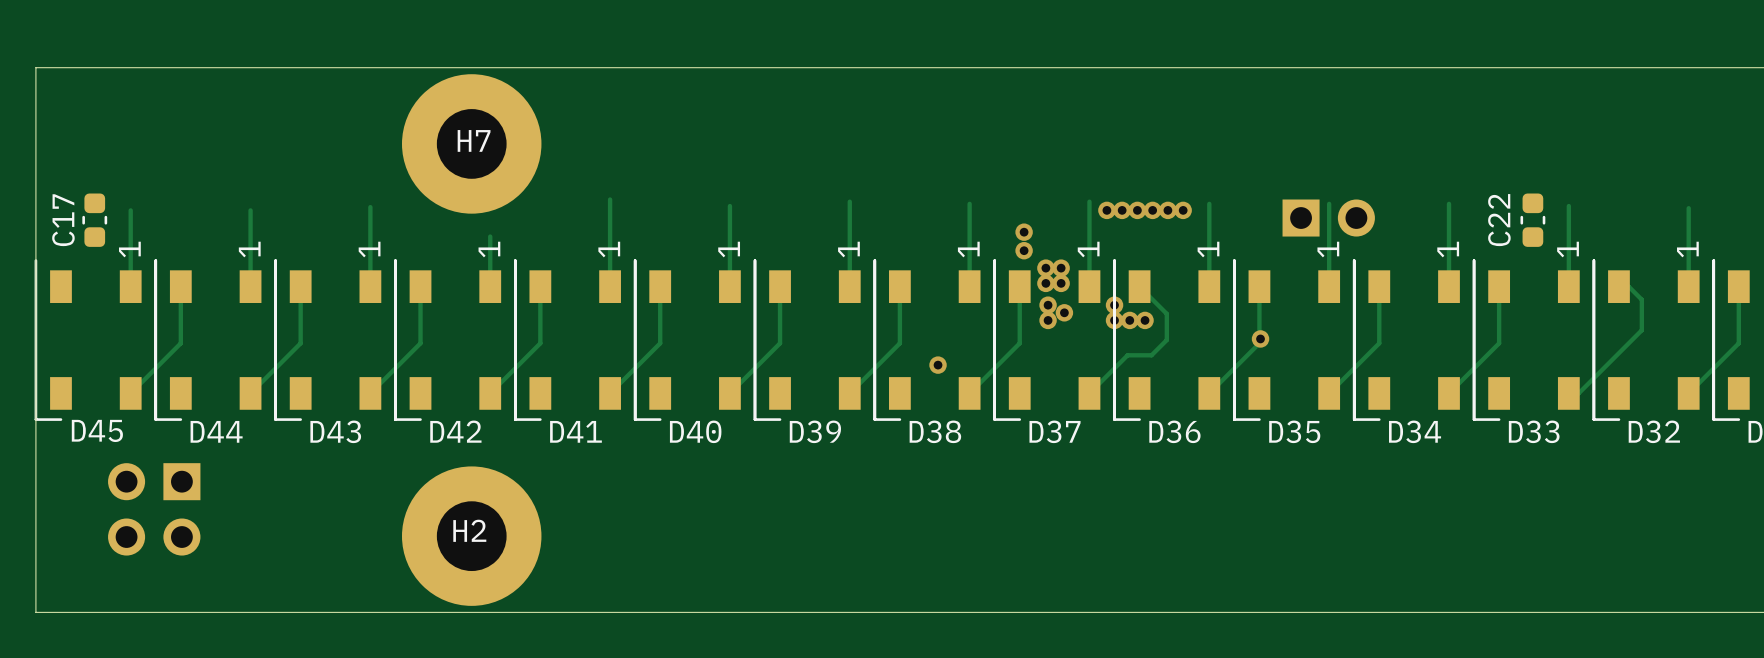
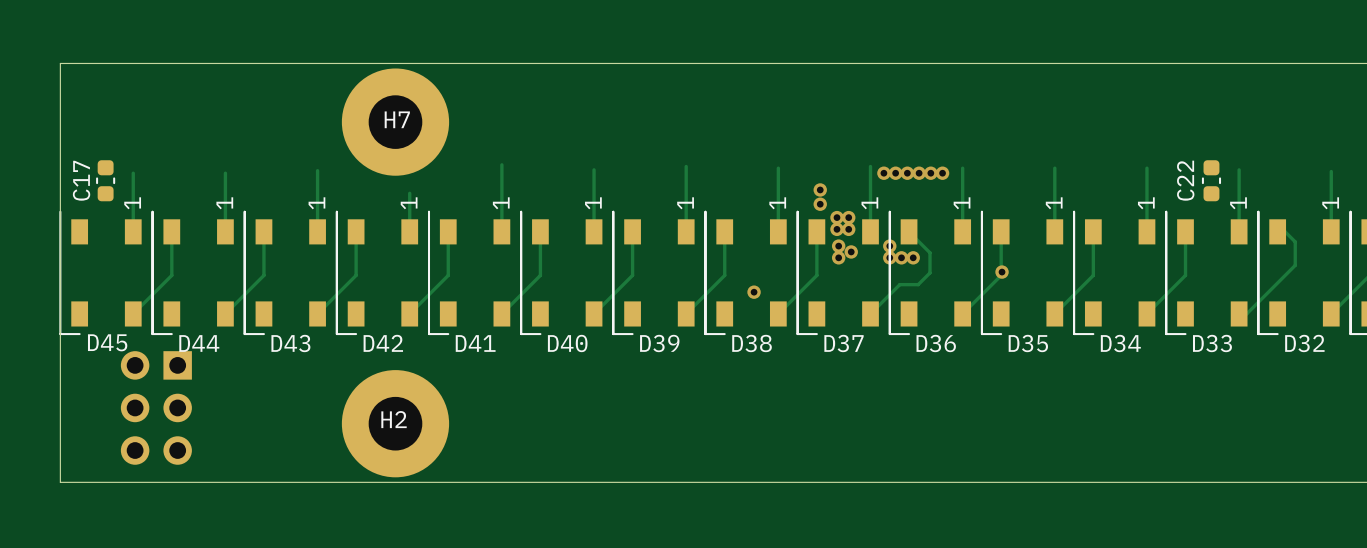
part: (1328, 218) -> none
part footprint: [108, 463, 201, 556] -> [120, 351, 192, 465]

